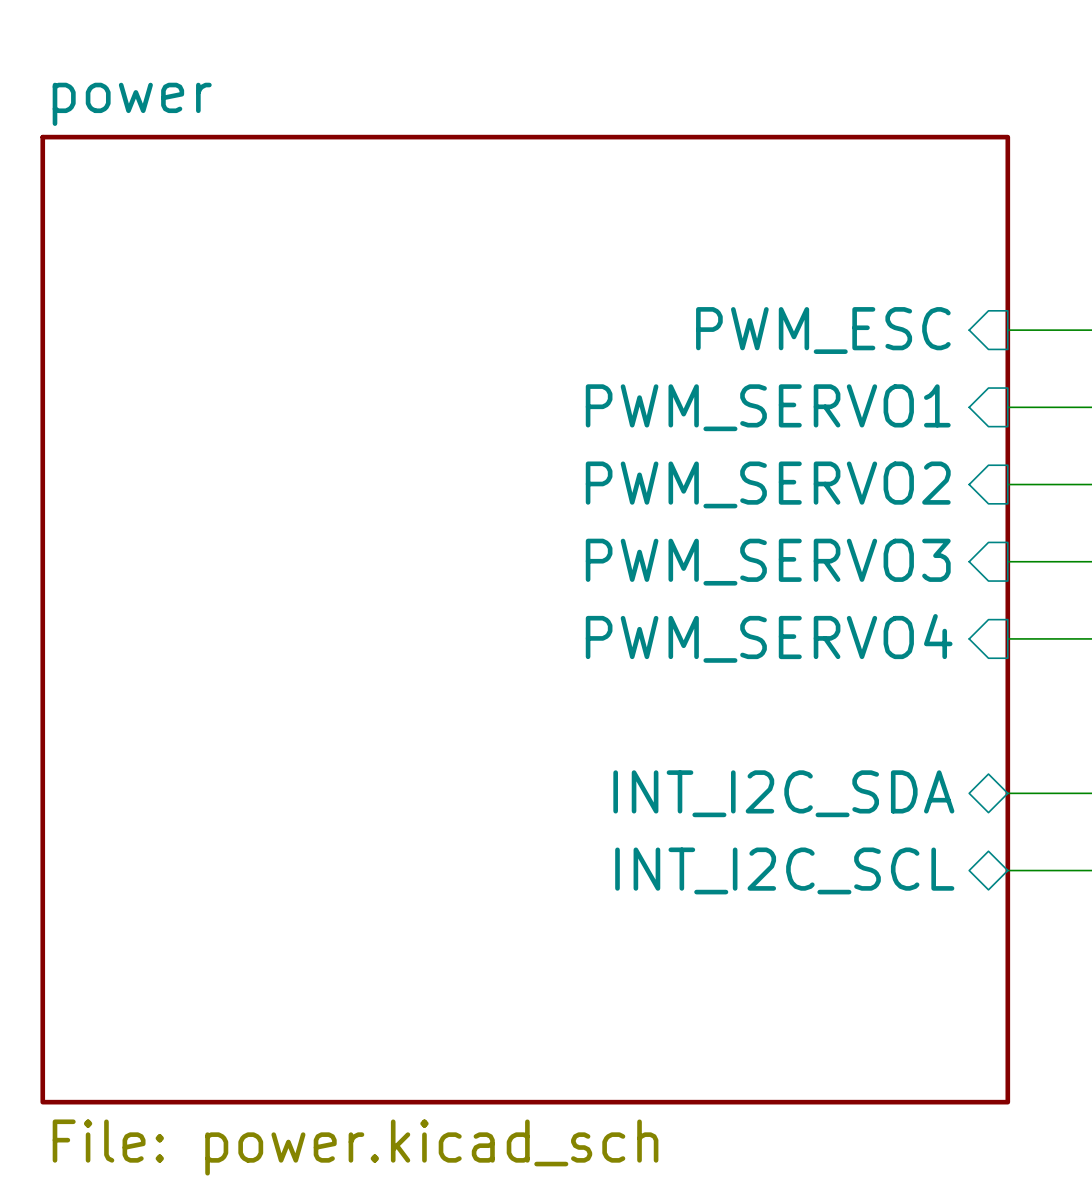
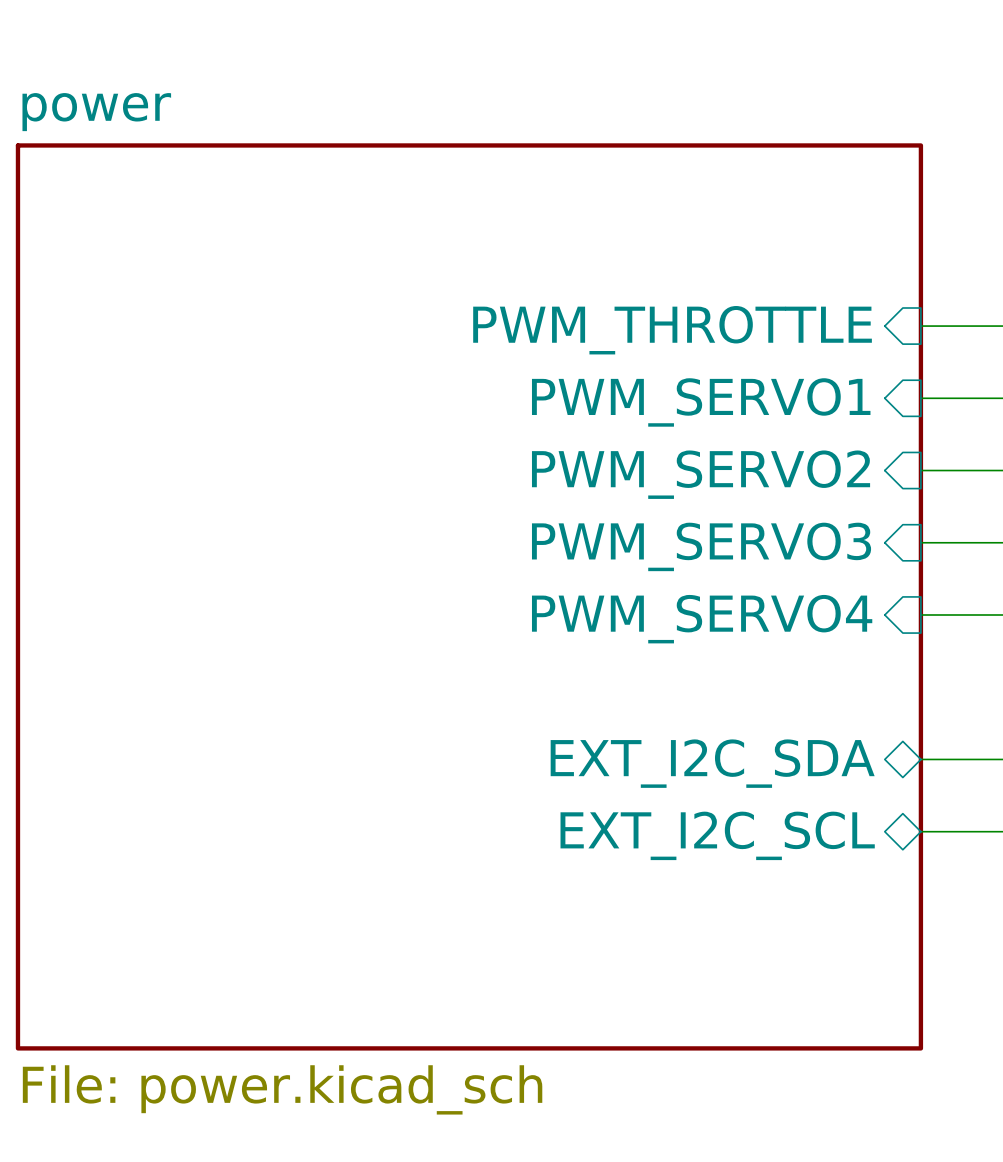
sheet pin: PWM_ESC (823, 330) -> PWM_THROTTLE (672, 330)
sheet pin: INT_I2C_SDA (783, 793) -> EXT_I2C_SDA (712, 763)
sheet pin: INT_I2C_SCL (784, 870) -> EXT_I2C_SCL (717, 835)

